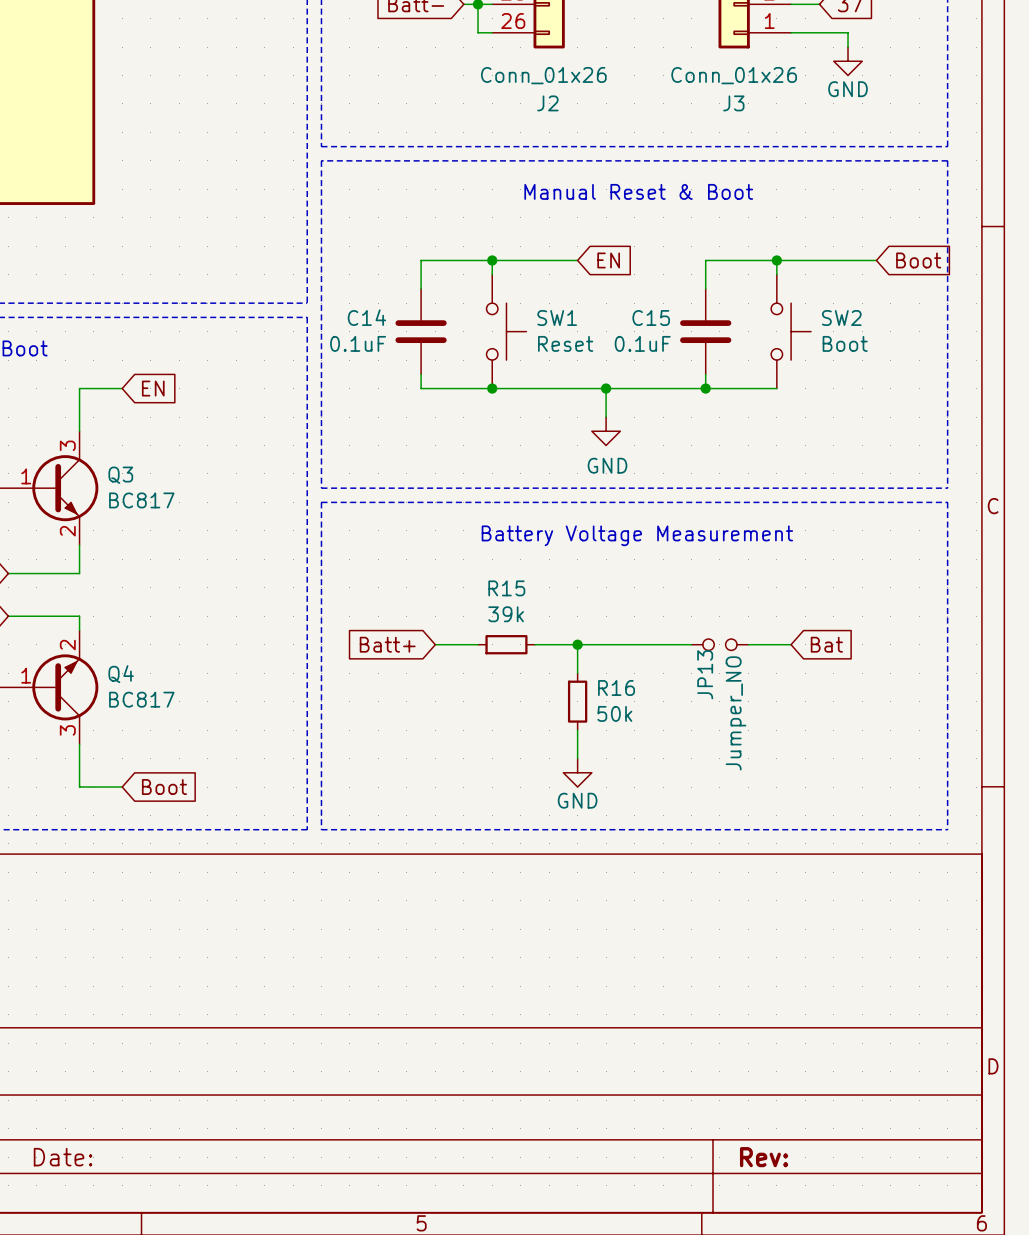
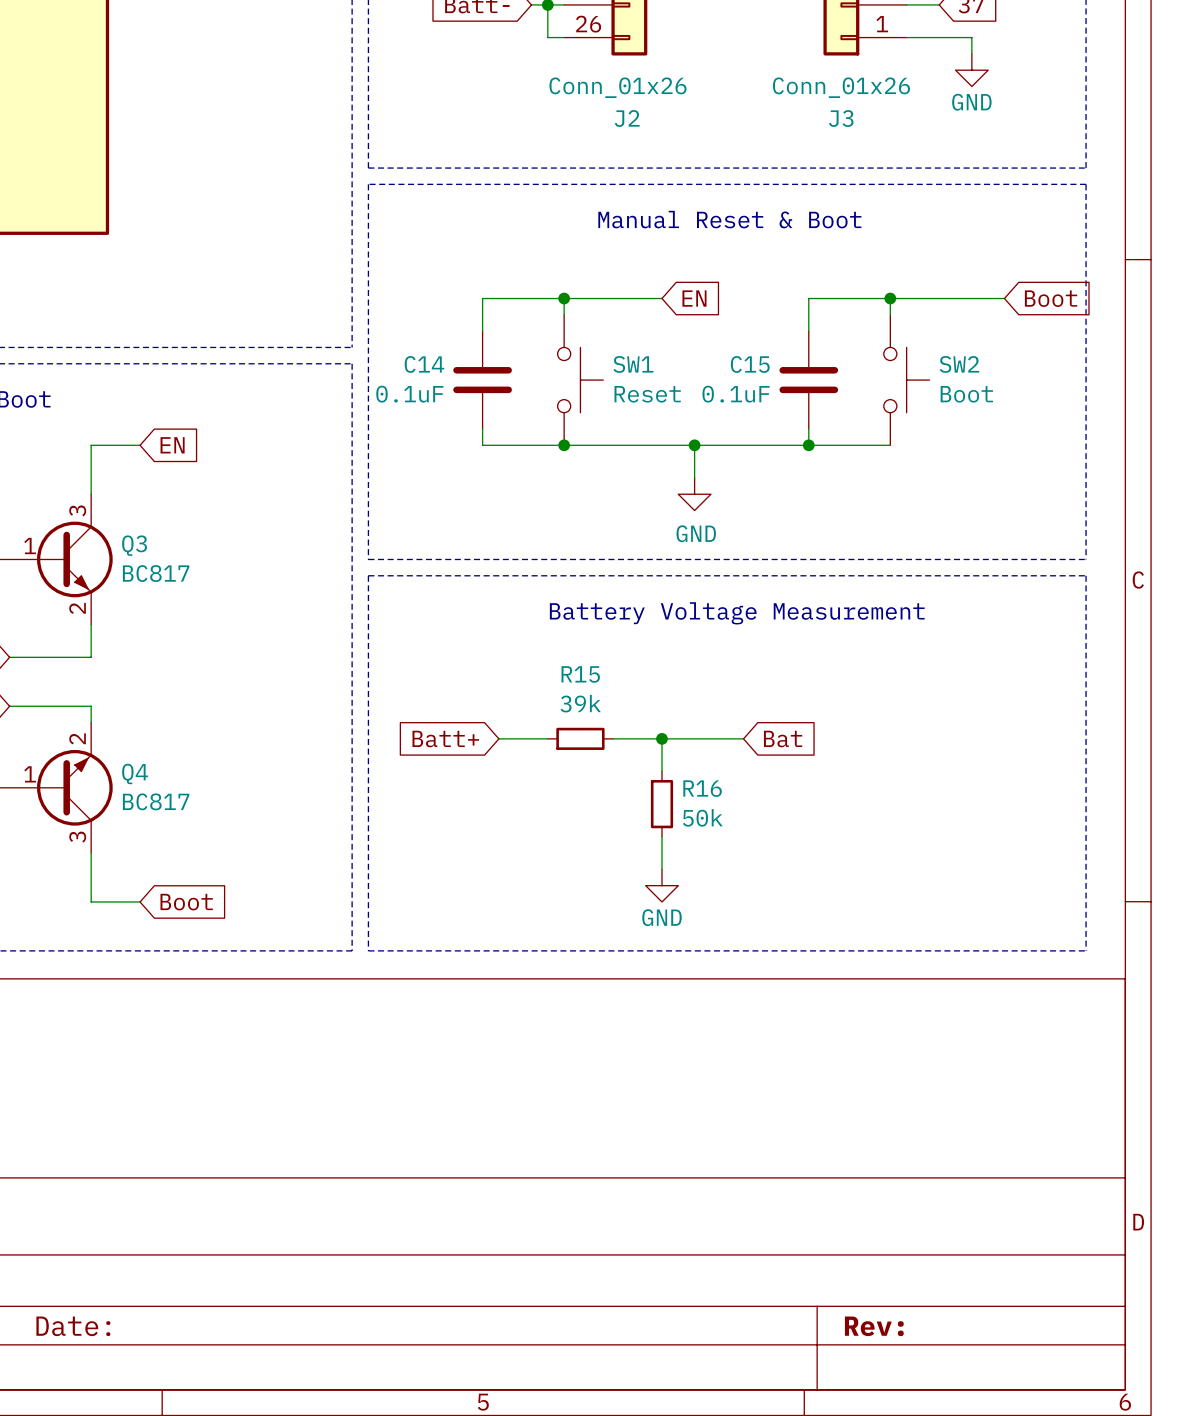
wire: (648, 644) (691, 644) -> none
JP13: Jumper_NO (719, 644) -> none
wire: (748, 644) (791, 644) -> none
global label position: Bat (826, 644) -> Bat (783, 739)

